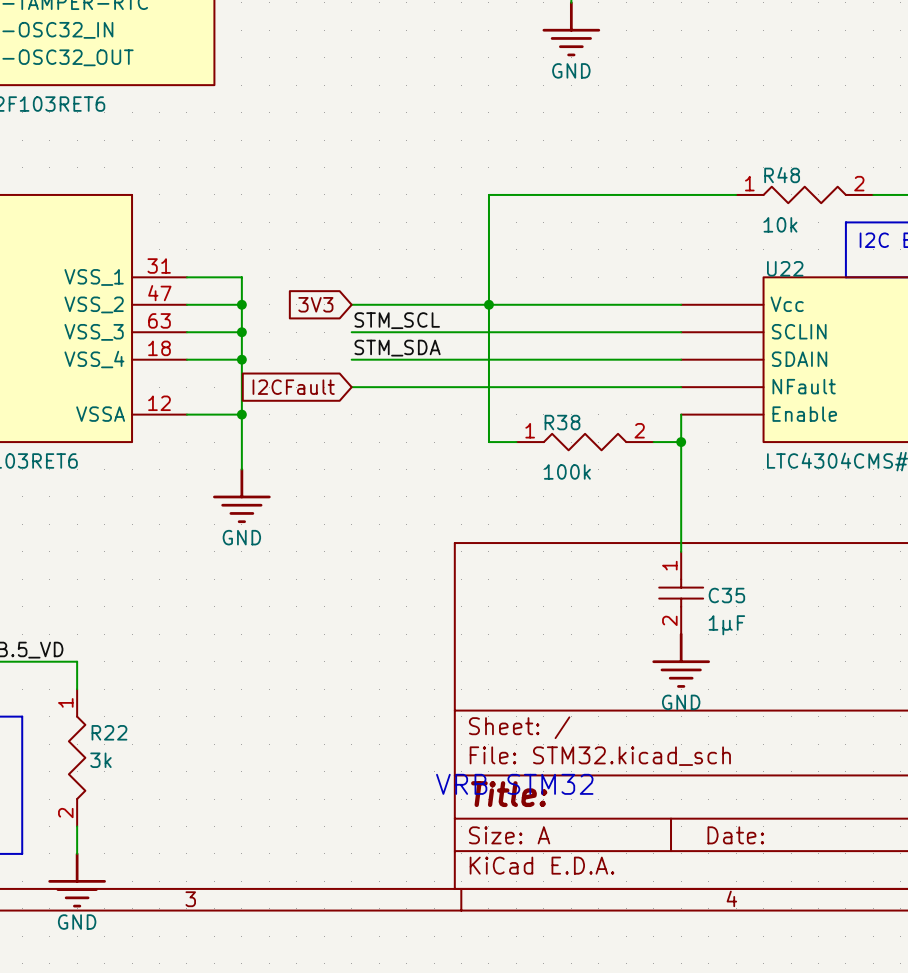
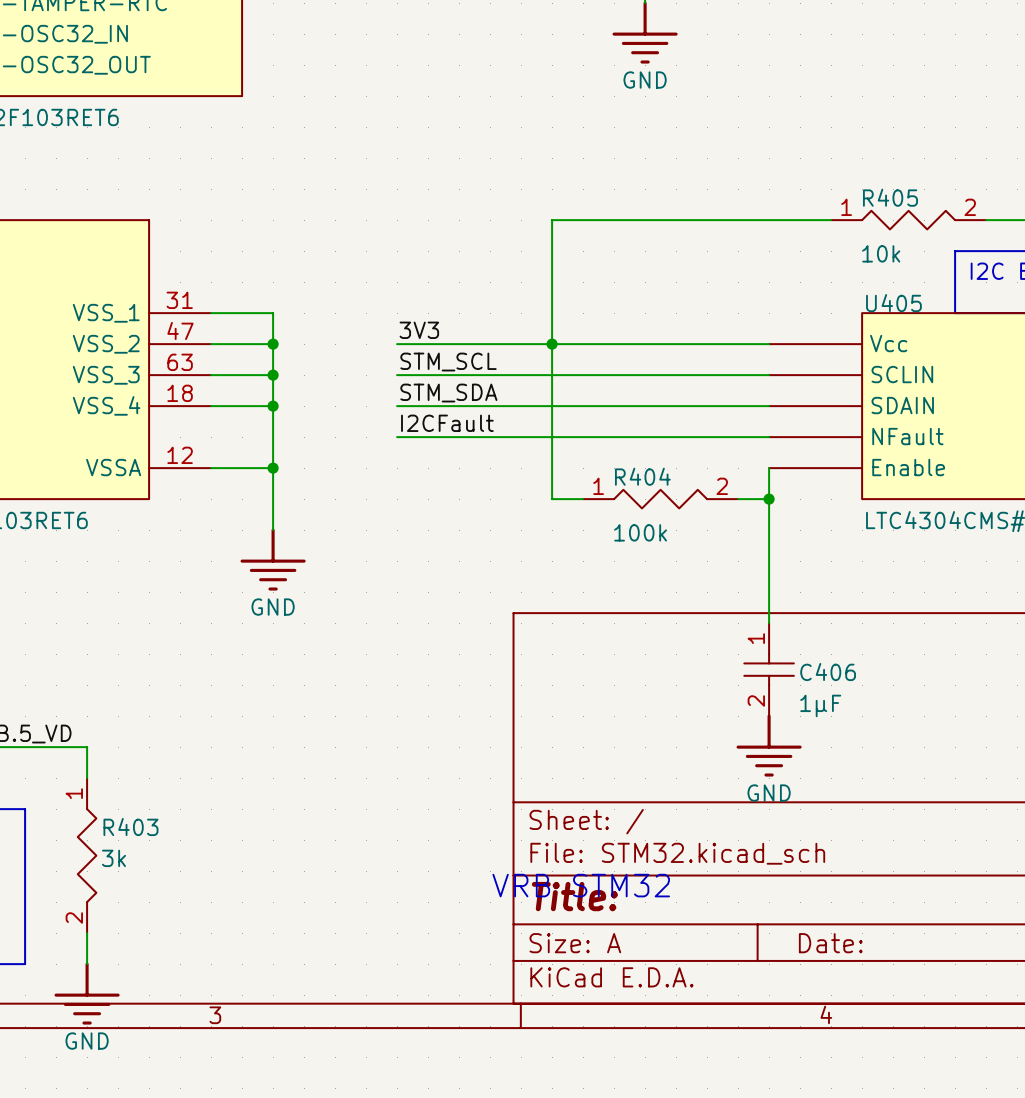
R48 name: R48 (782, 175) -> R405 (890, 197)
U22 name: U22 (785, 268) -> U405 (893, 303)
label: none -> 3V3 (419, 330)
global label: 3V3 (315, 304) -> none
label: none -> I2CFault (447, 423)
global label: I2CFault (293, 387) -> none
R38 name: R38 (562, 422) -> R404 (642, 476)
C35 name: C35 (726, 595) -> C406 (828, 672)
R22 name: R22 (109, 732) -> R403 (130, 827)

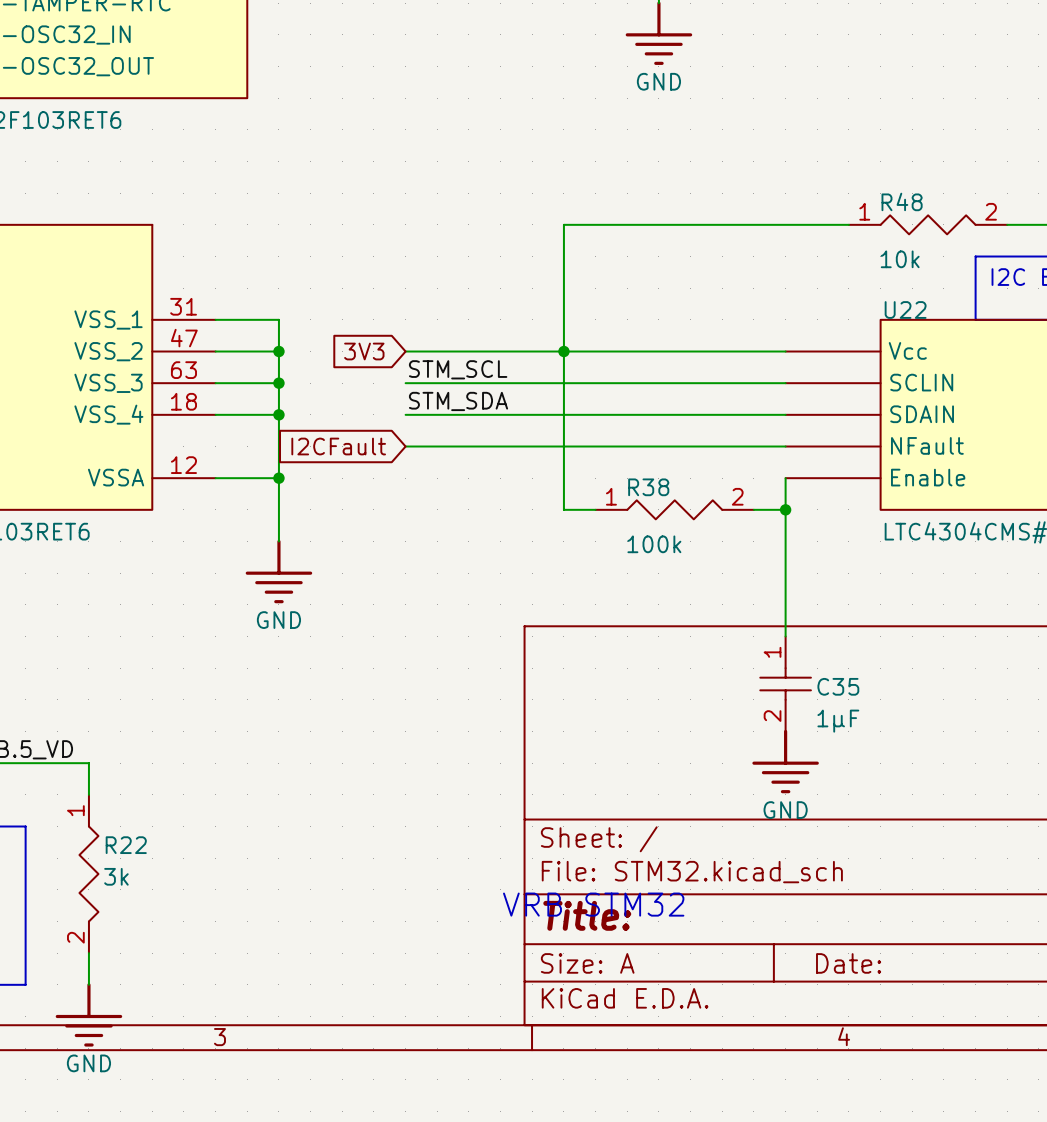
R405 name: R405 (890, 197) -> R48 (902, 201)
U405 name: U405 (893, 303) -> U22 (905, 309)
label: 3V3 (419, 330) -> none
global label: none -> 3V3 (364, 351)
label: I2CFault (447, 423) -> none
global label: none -> I2CFault (338, 446)
R404 name: R404 (642, 476) -> R38 (648, 487)
C406 name: C406 (828, 672) -> C35 (838, 686)
R403 name: R403 (130, 827) -> R22 (126, 845)

